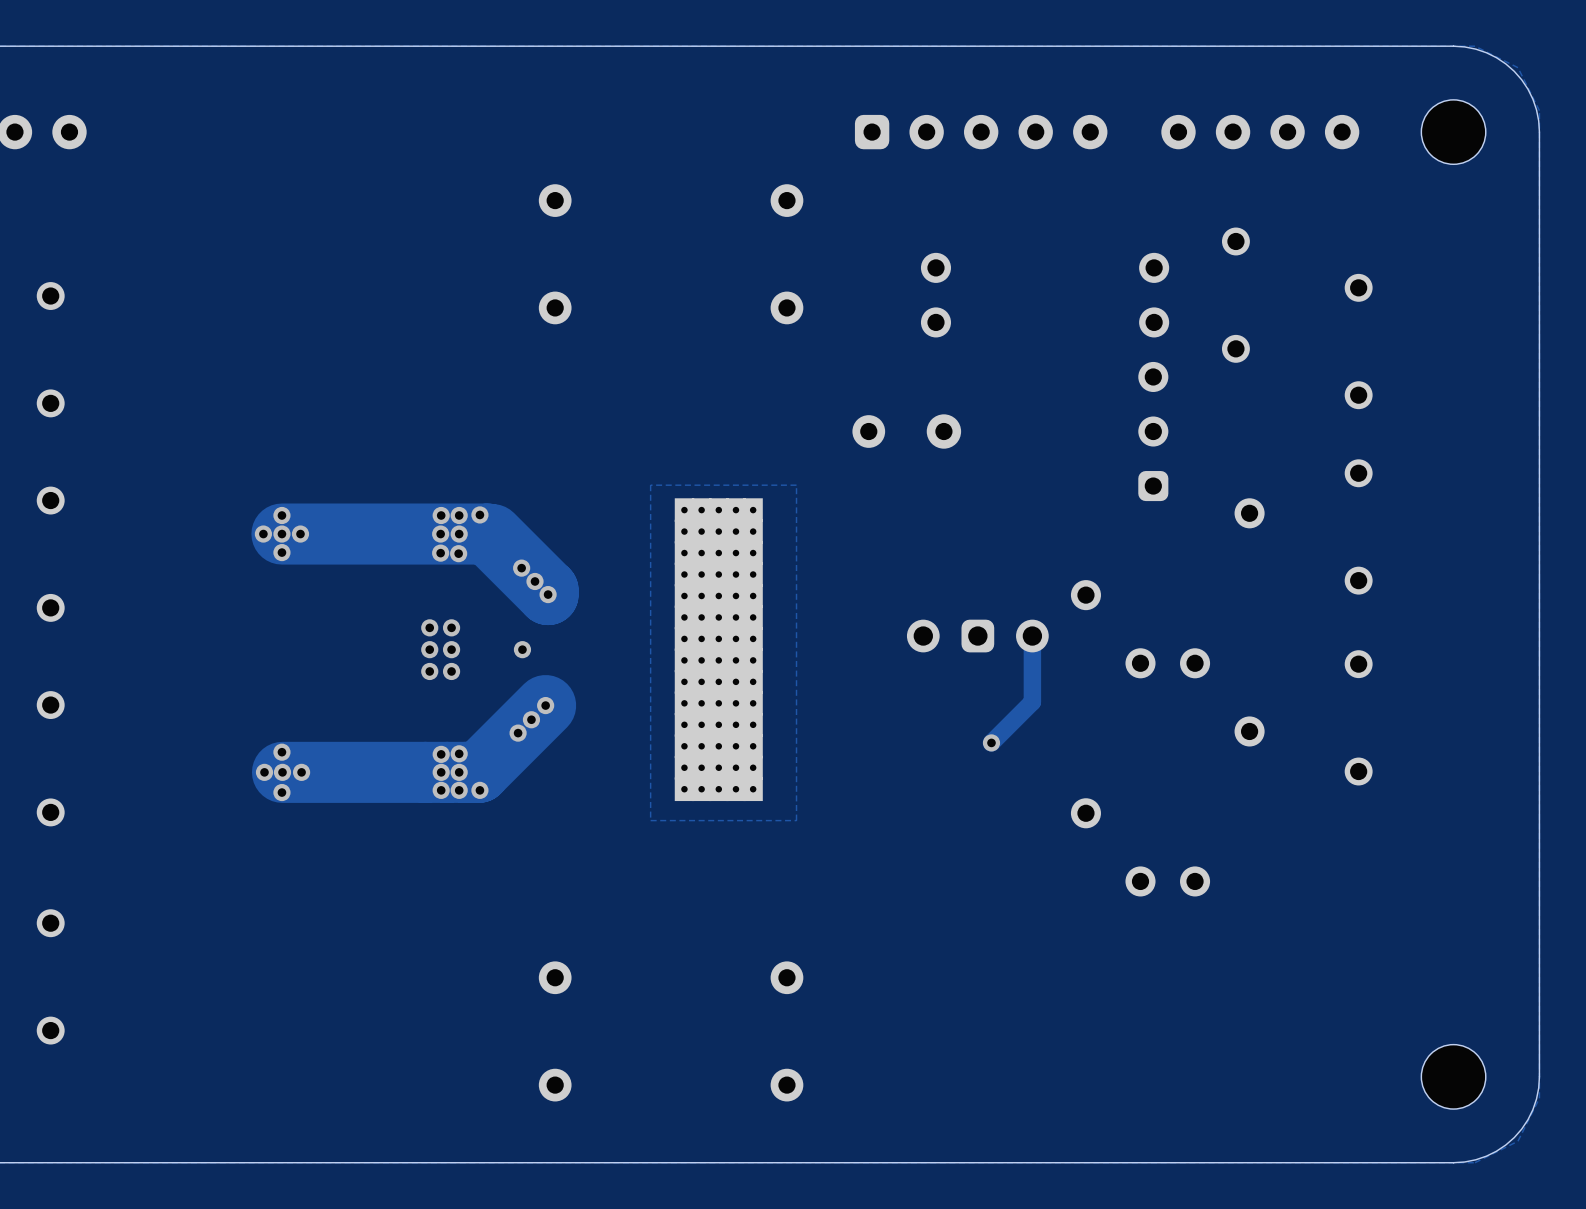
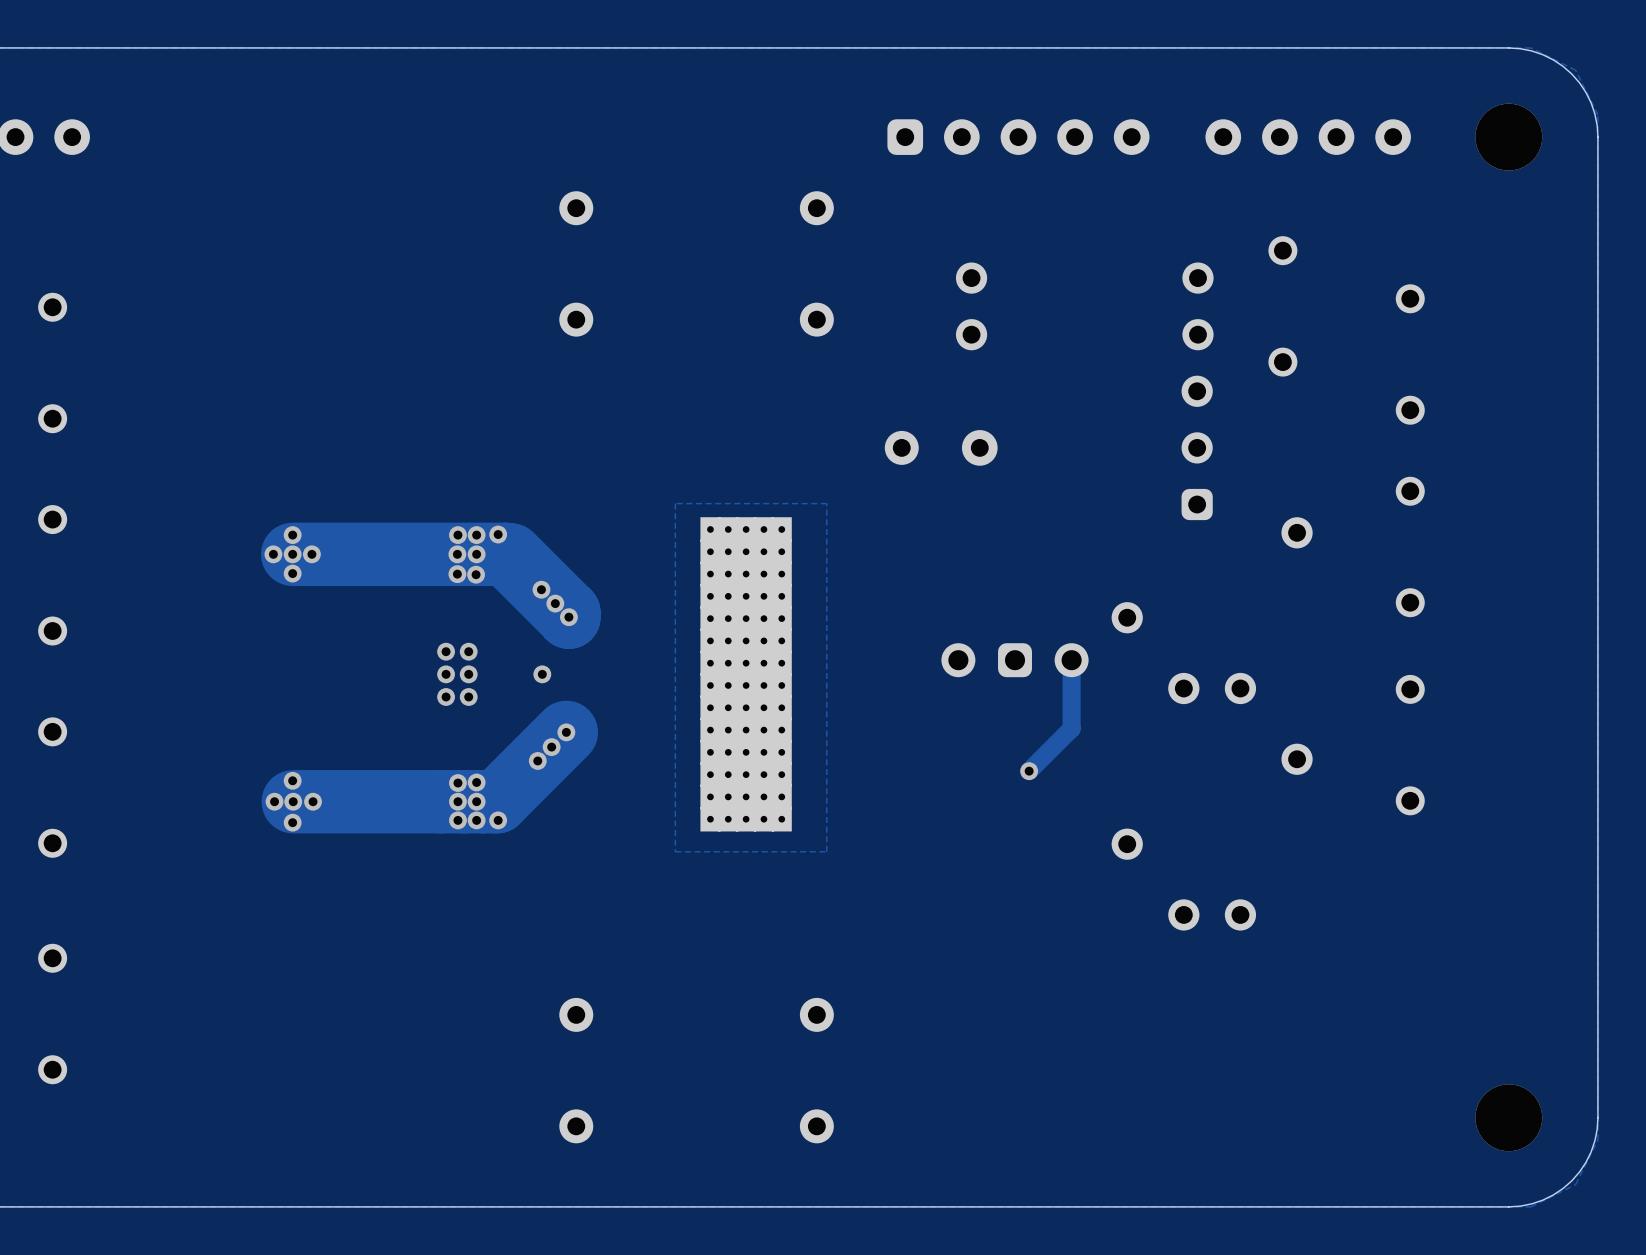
part footprint: [1421, 99, 1486, 165] -> [1475, 103, 1543, 171]
part footprint: [1421, 1044, 1486, 1110] -> [1475, 1084, 1543, 1152]

